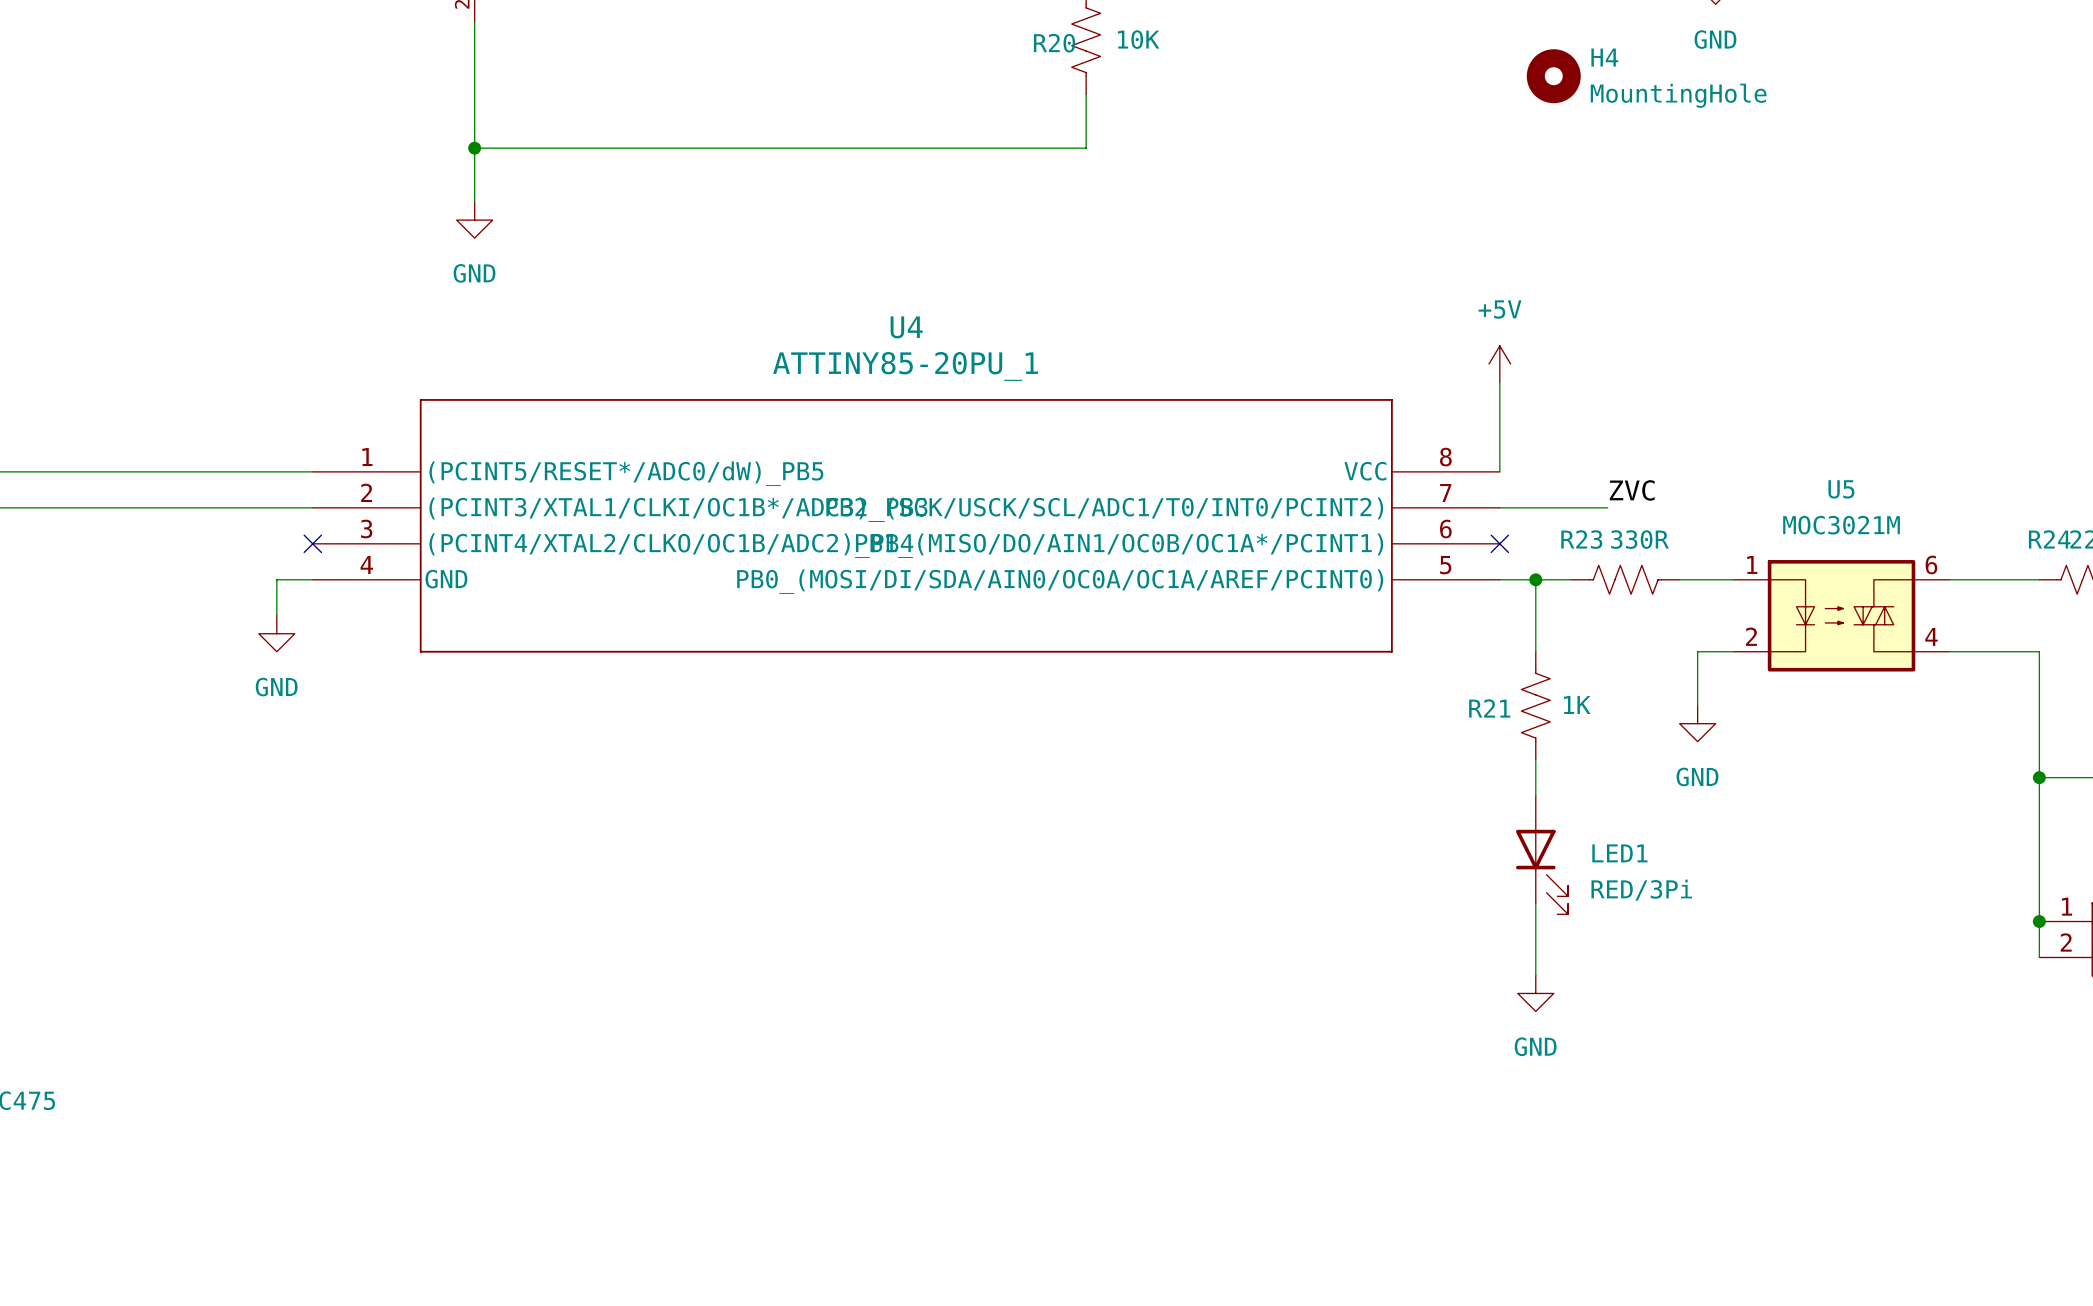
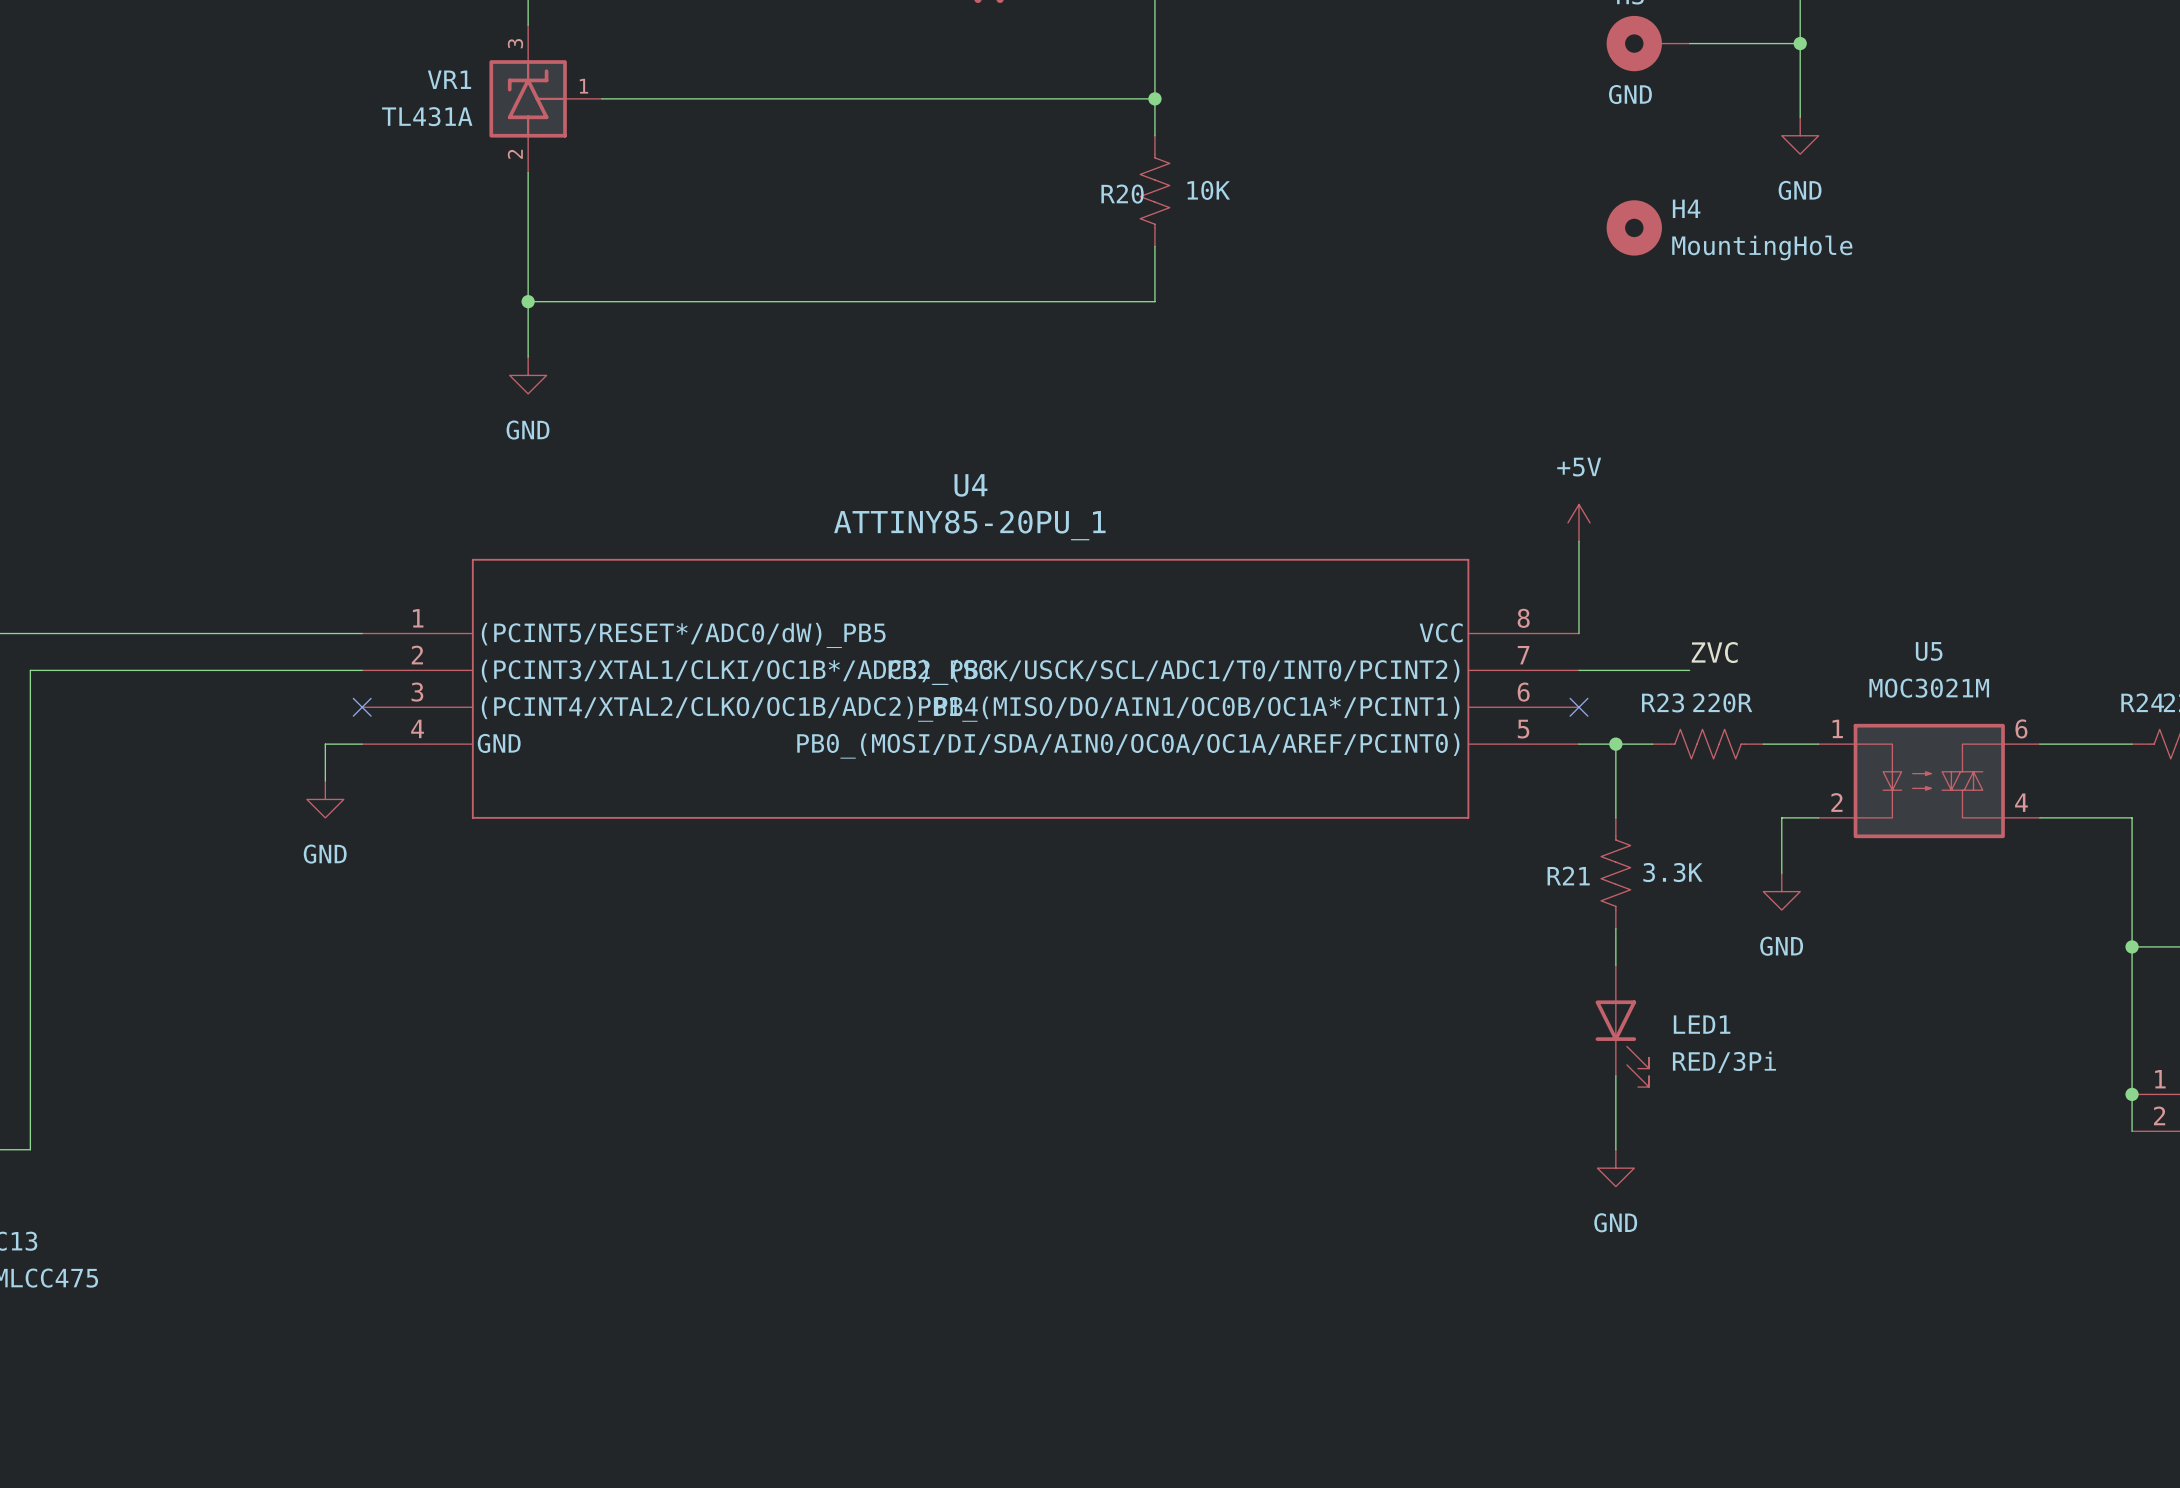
R23 value: 330R (1639, 539) -> 220R (1722, 702)
R21 value: 1K (1577, 705) -> 3.3K (1672, 872)

